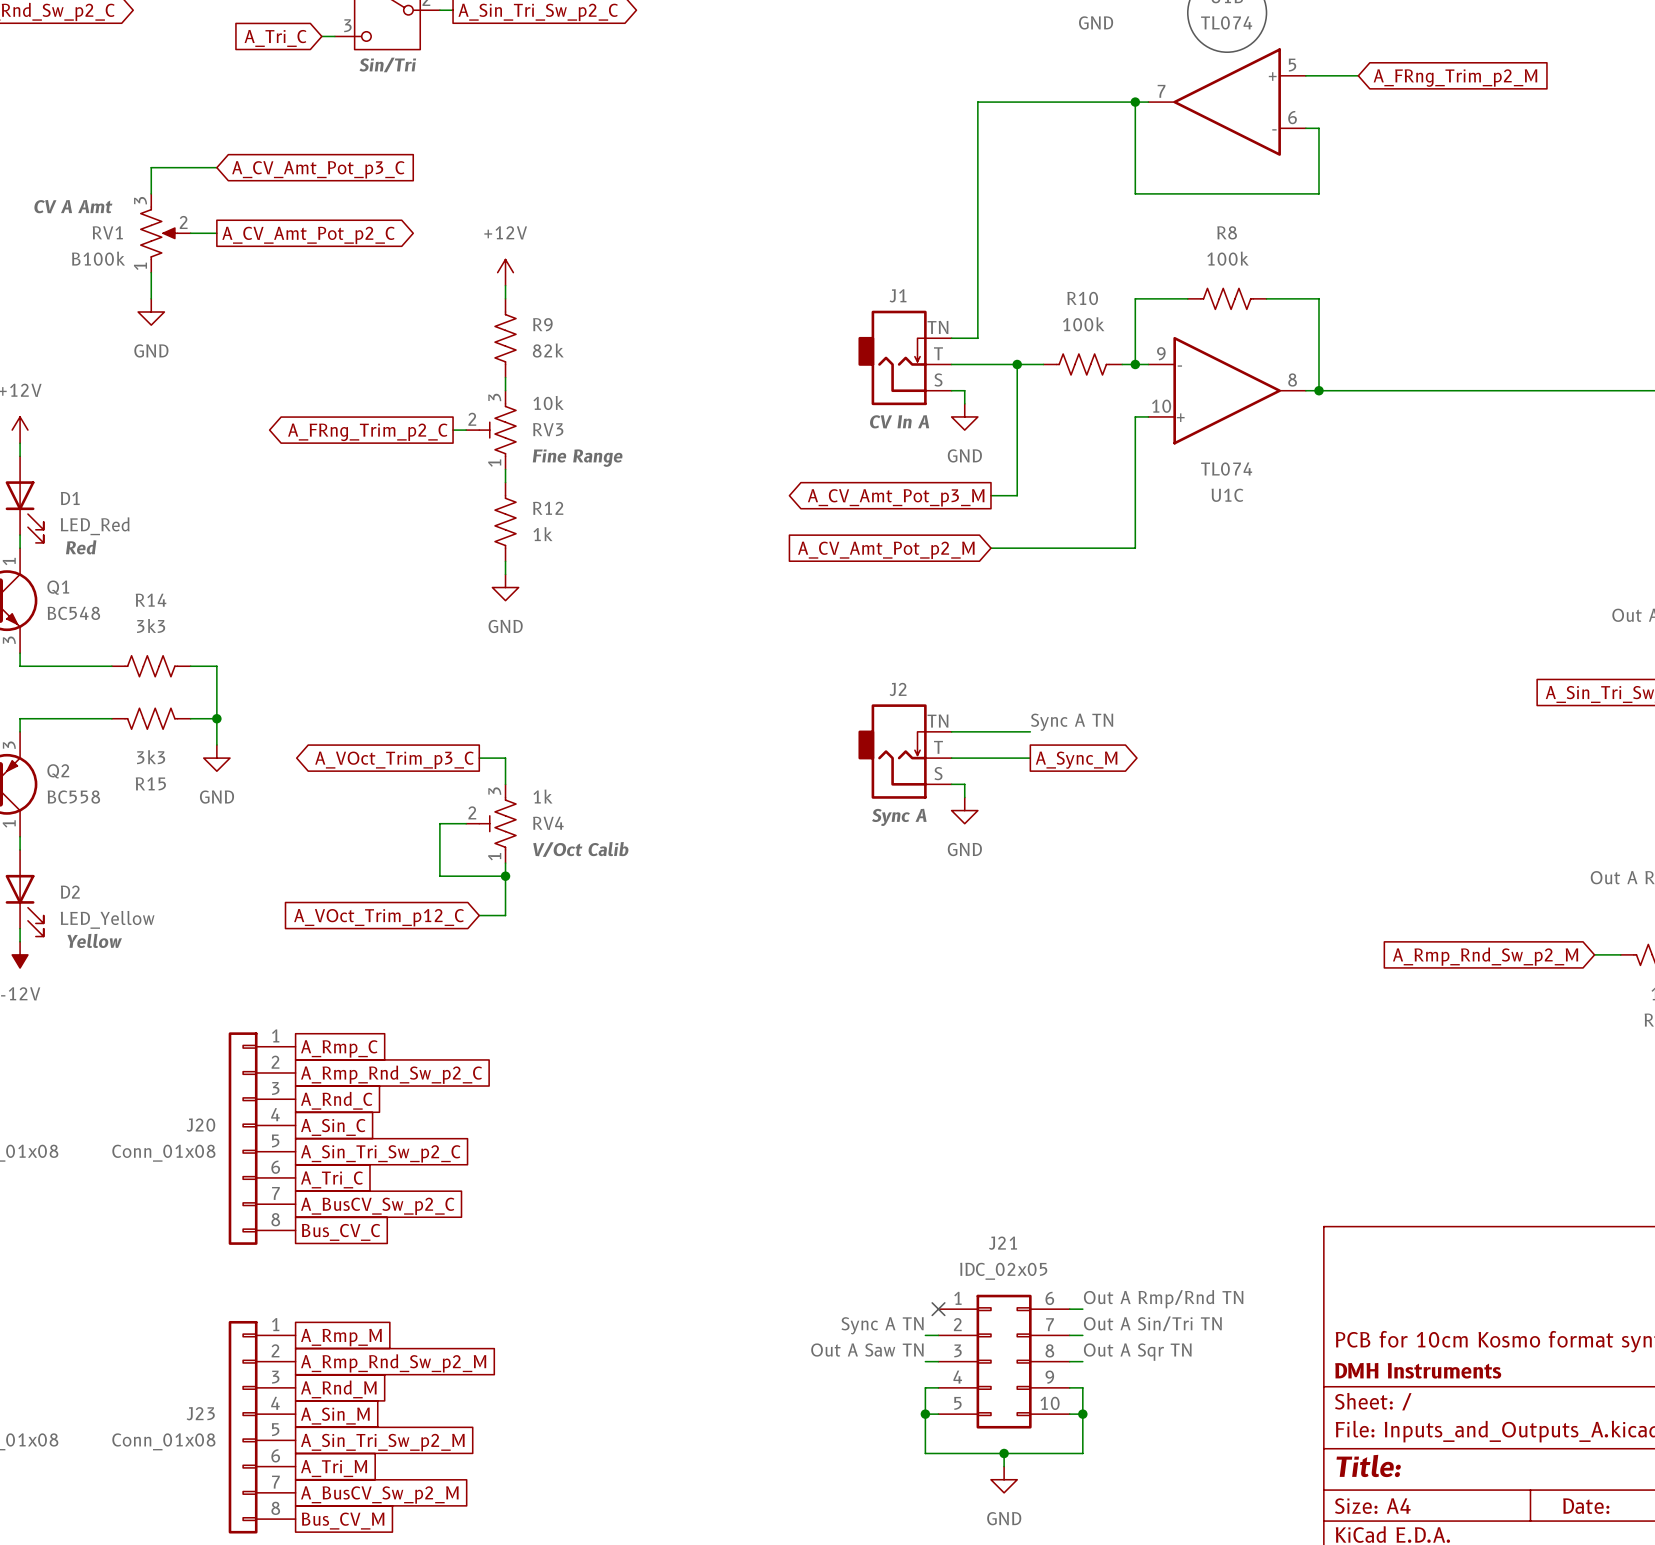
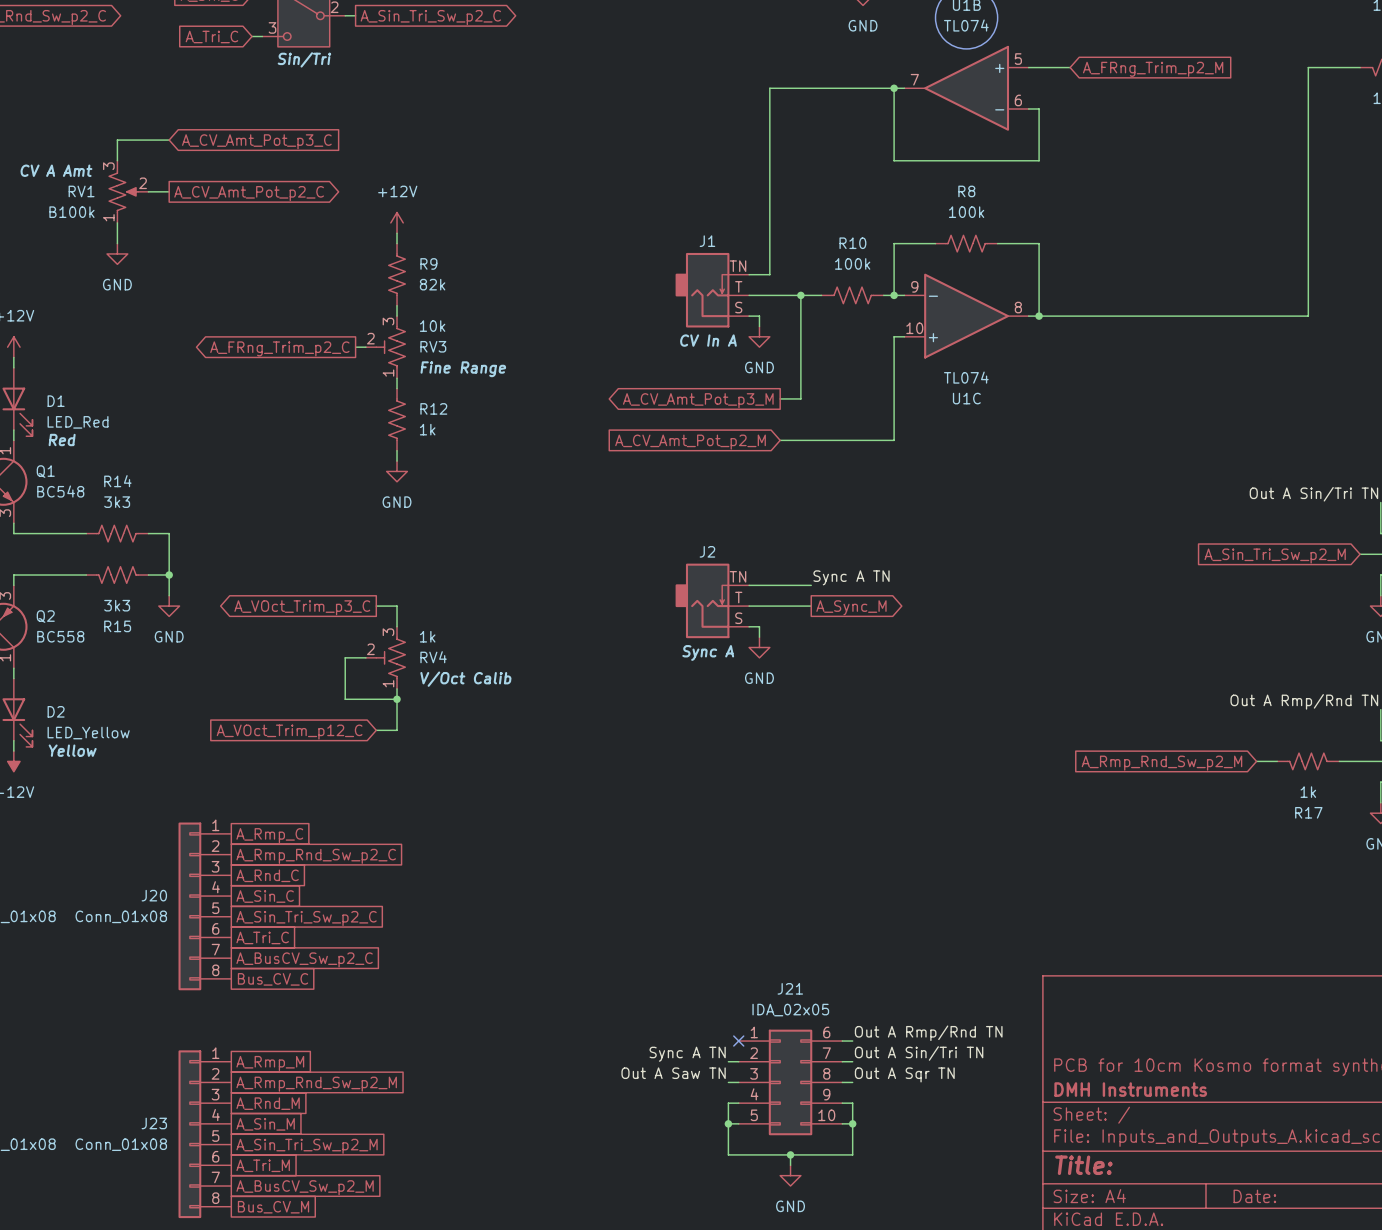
J21 value: IDC_02x05 (1003, 1271) -> IDA_02x05 (790, 1010)

